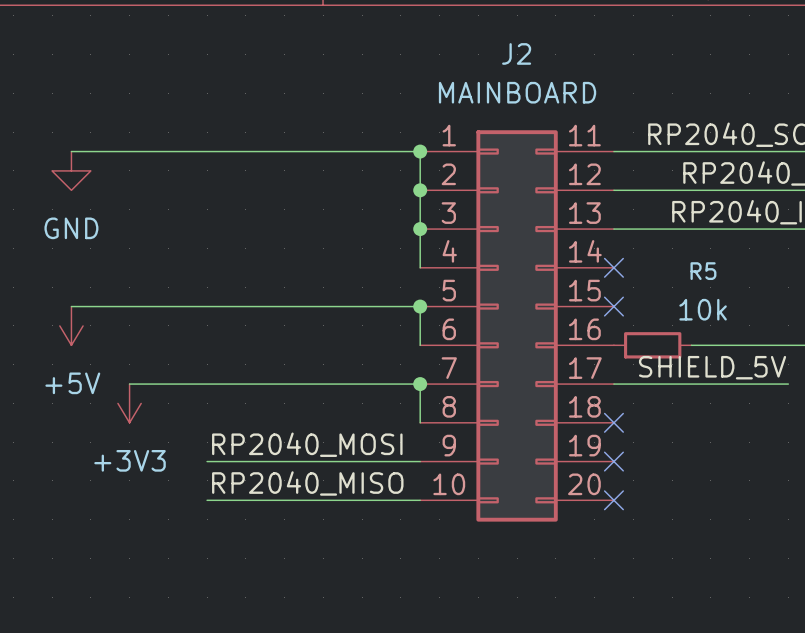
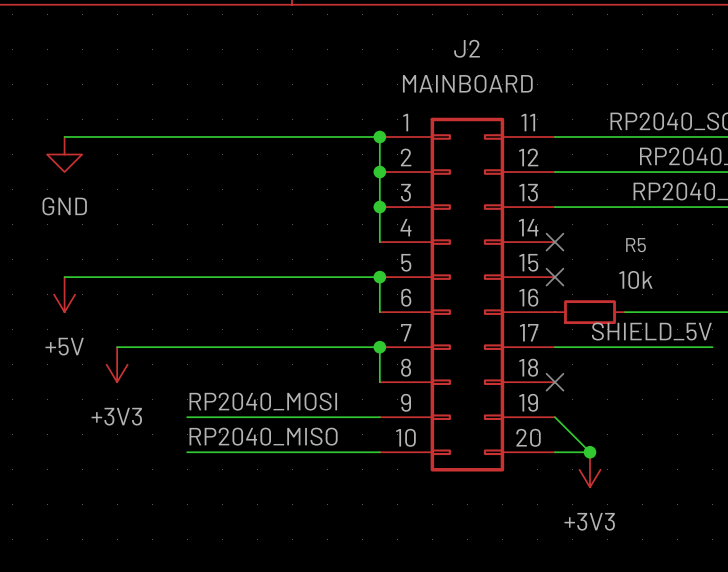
wire: none -> (554, 417) (590, 452) (554, 452)
no-connect mark: (613, 461) -> none
no-connect mark: (613, 500) -> none
junction: none -> (590, 452)
power symbol: none -> +3V3 (590, 469)

